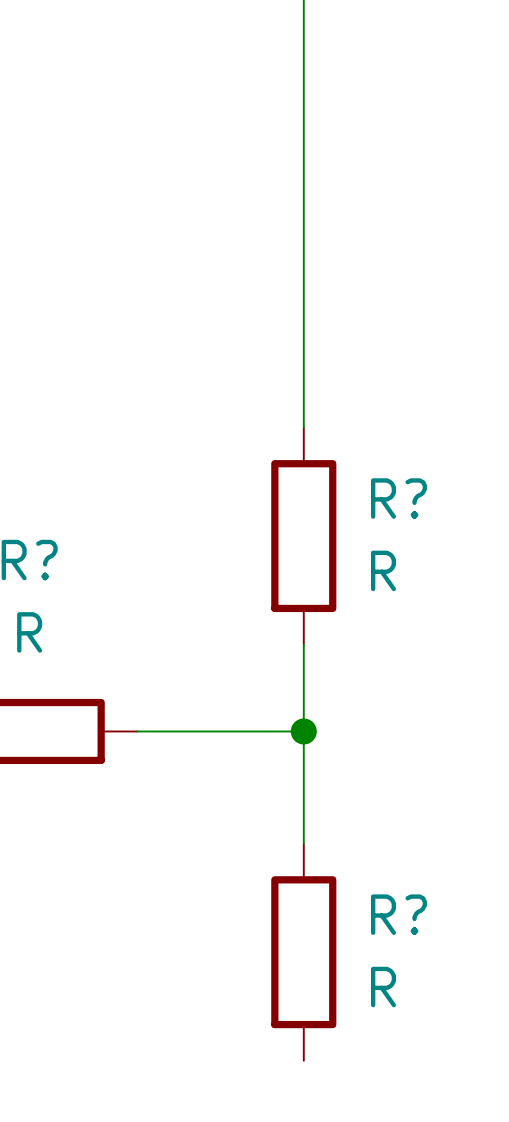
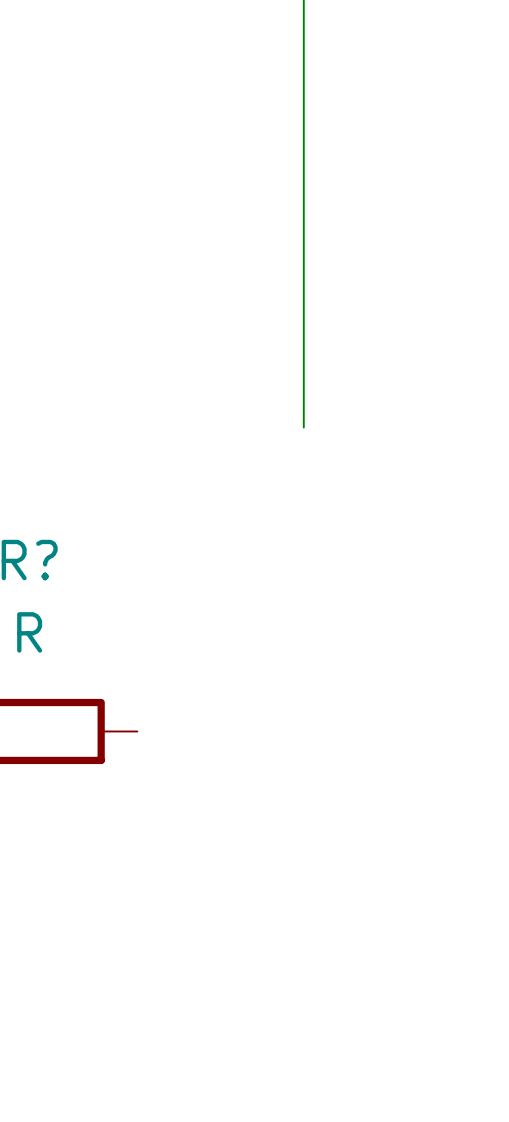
R?: R (303, 536) -> none
wire: (303, 644) (303, 843) -> none
wire: (137, 731) (303, 731) -> none
junction: (303, 731) -> none
R?: R (303, 952) -> none

